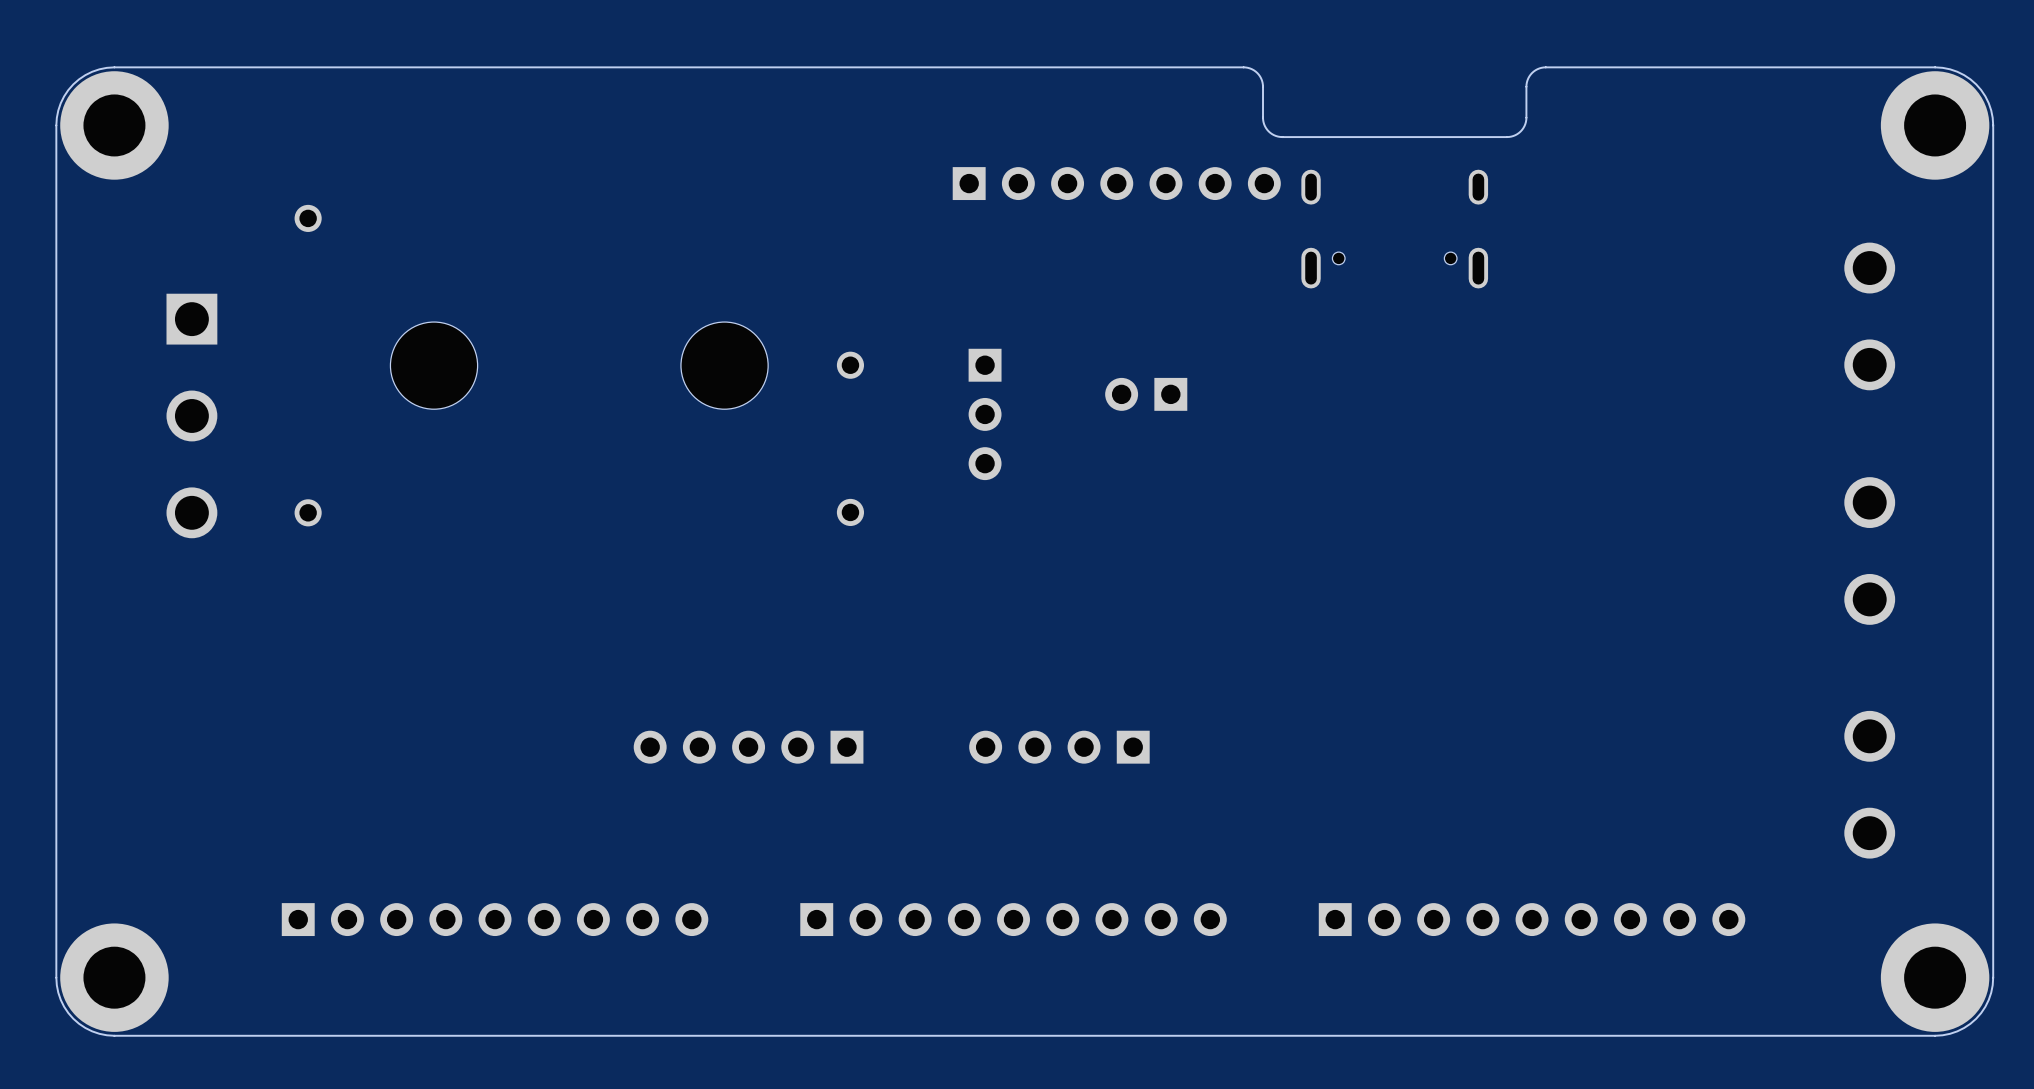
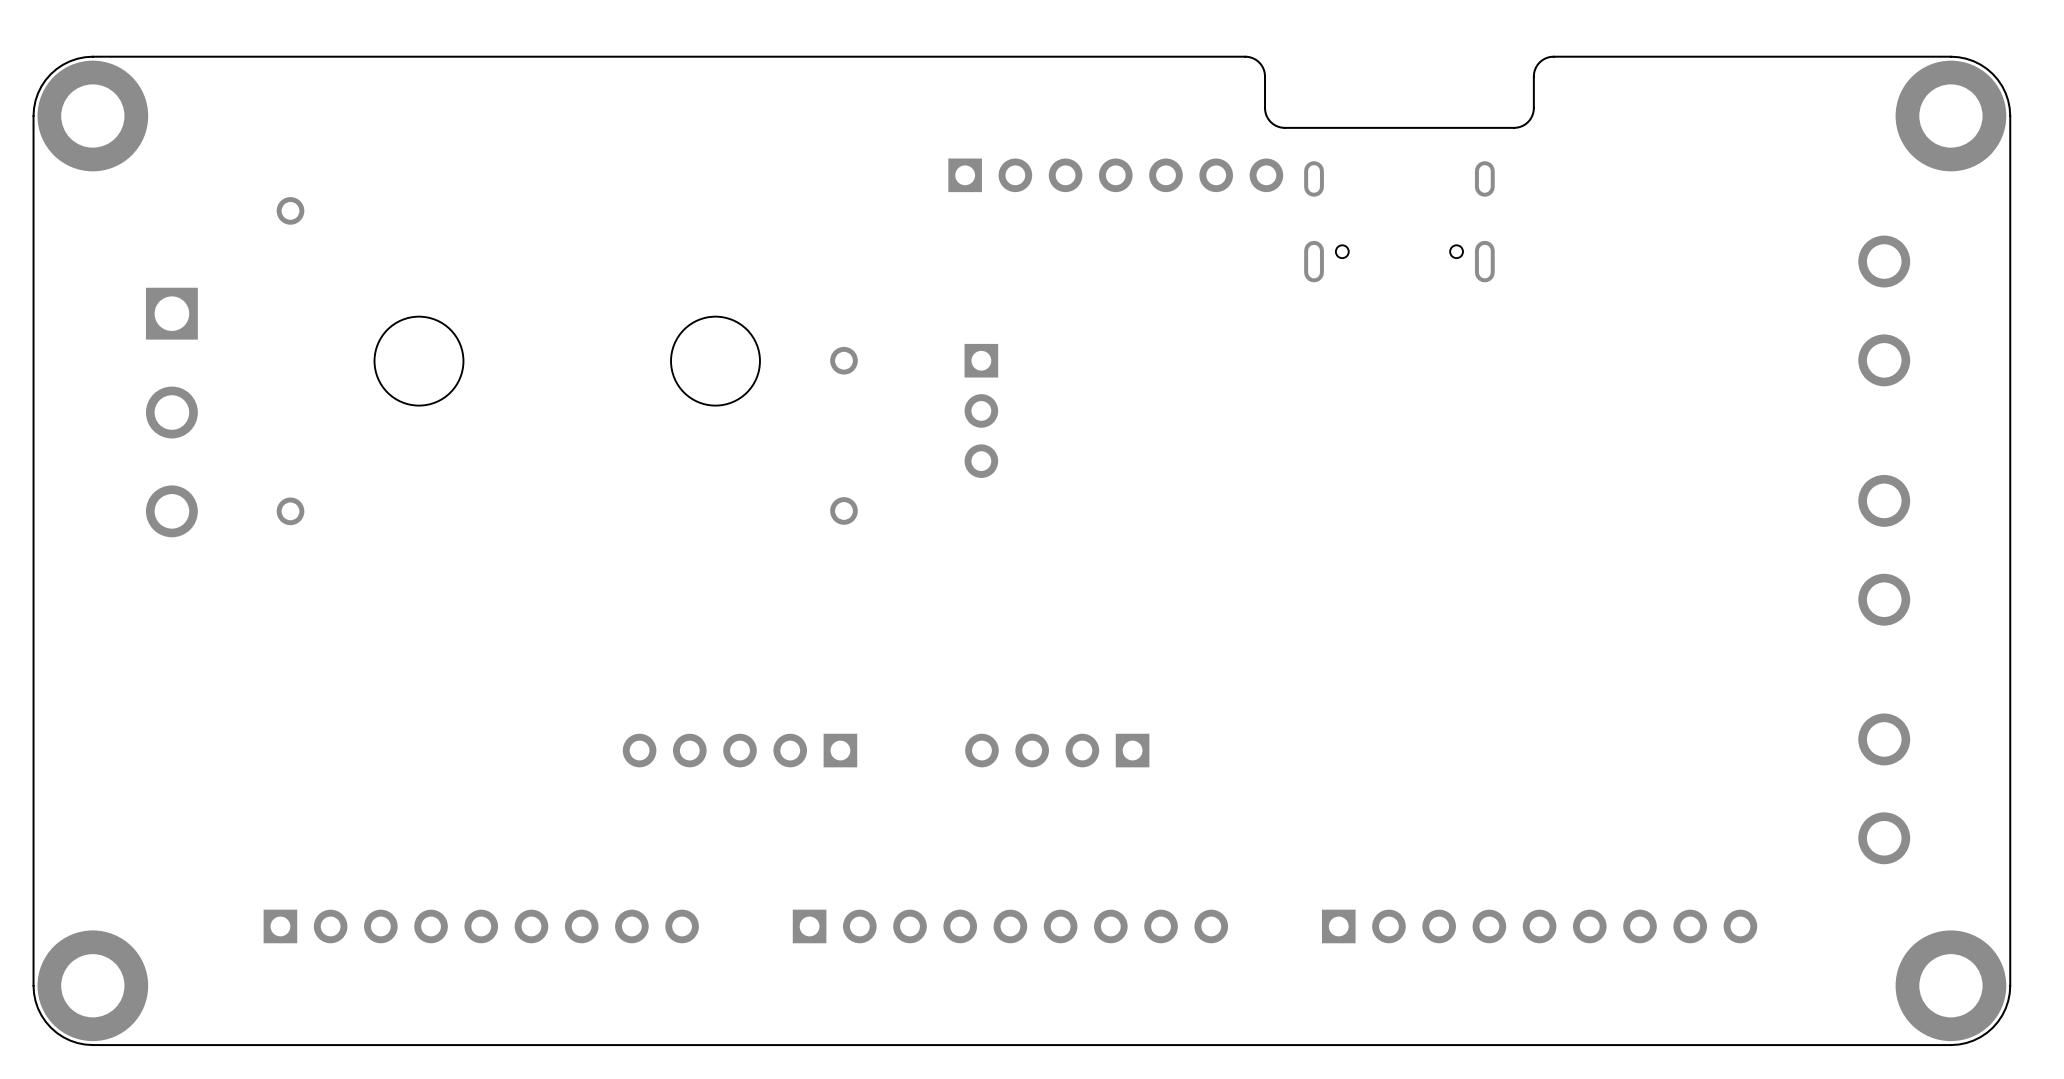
part: (1146, 394) -> none

